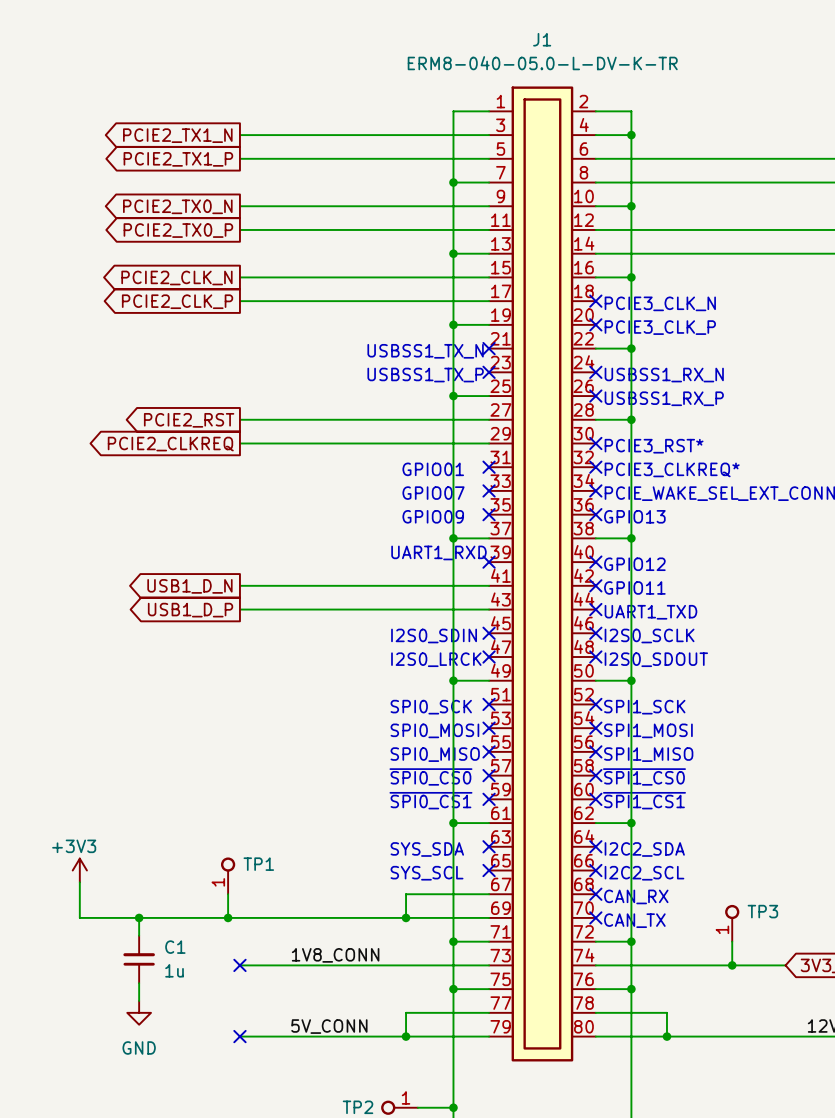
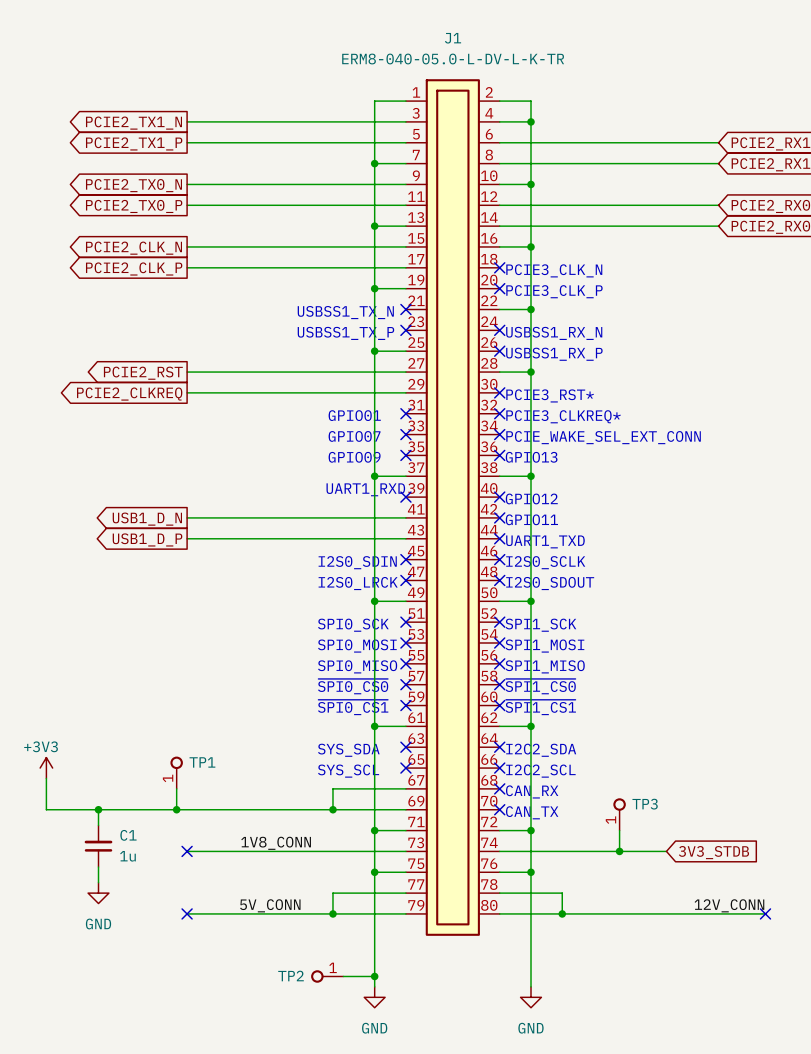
J1 text: ERM8-040-05.0-L-DV-K-TR (542, 63) -> ERM8-040-05.0-L-DV-L-K-TR (453, 59)

